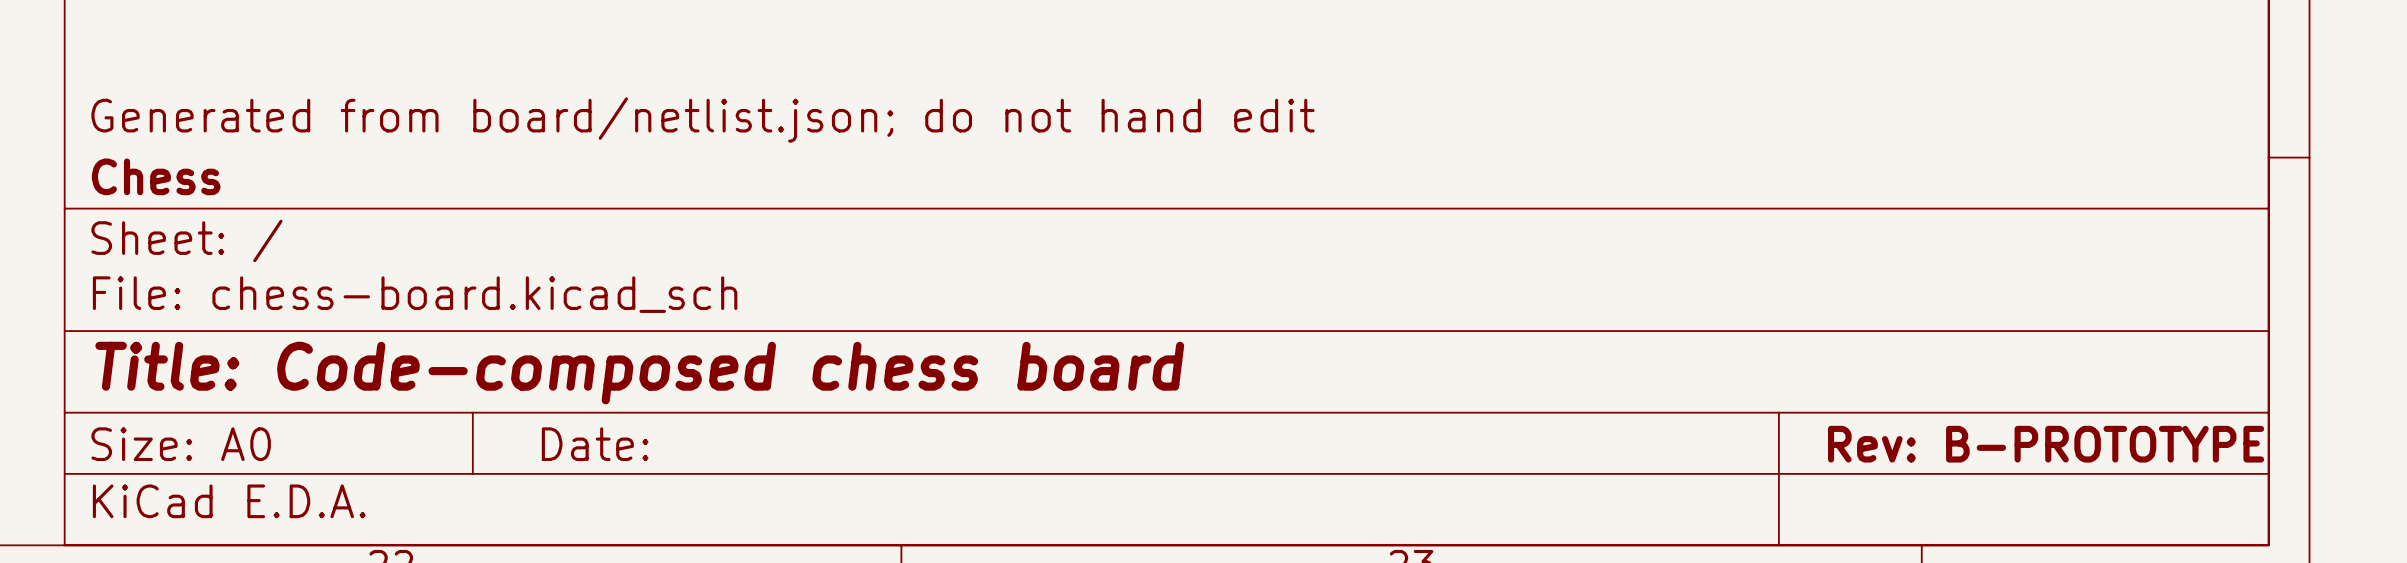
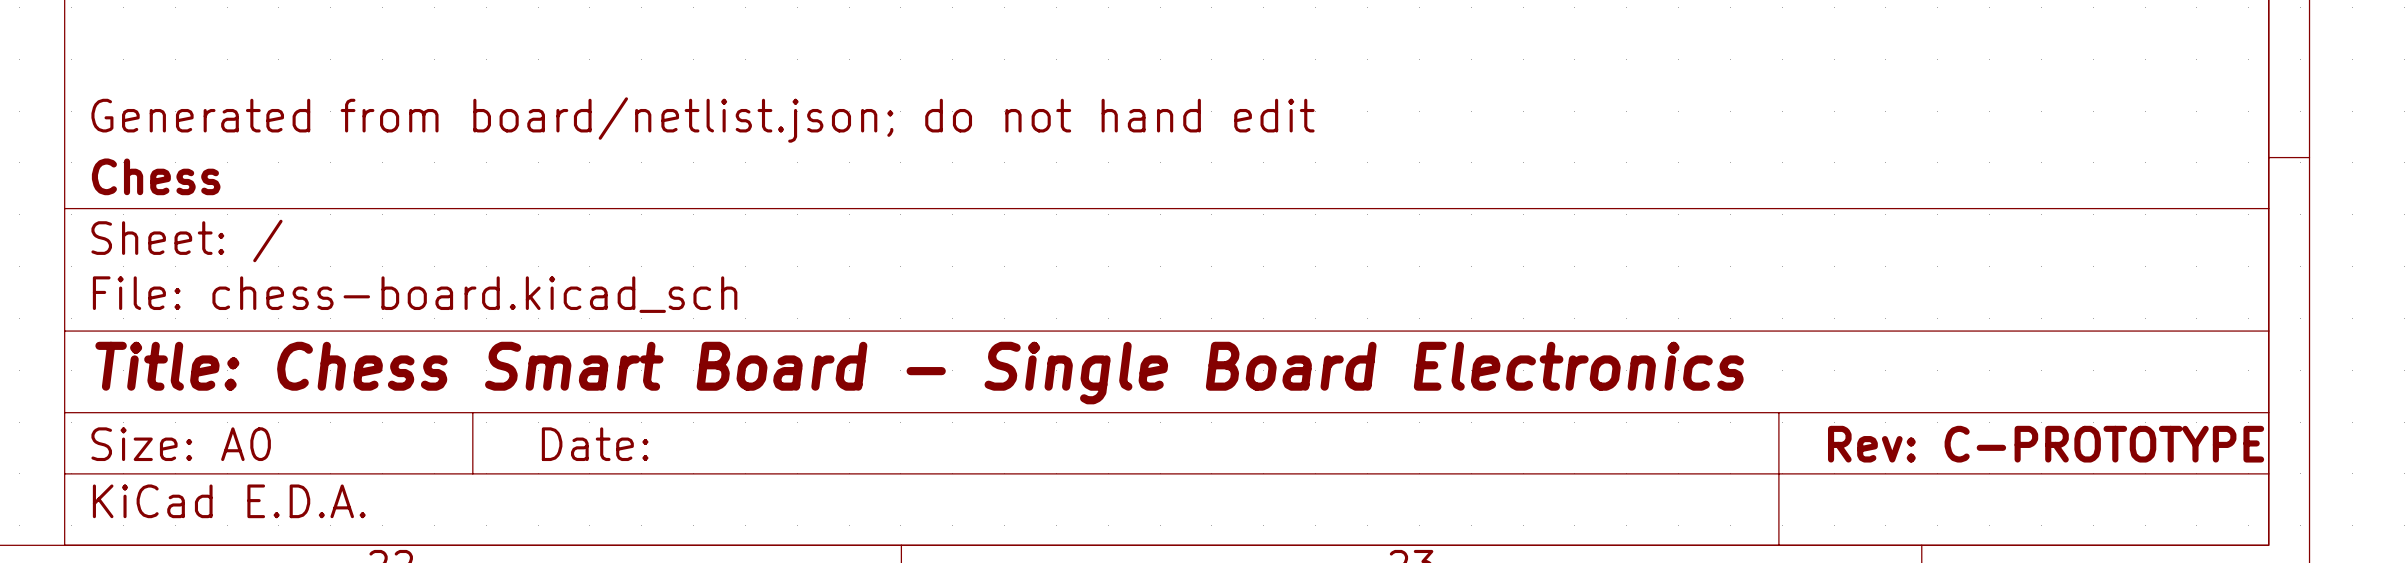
title block: Title: Code-composed chess board (639, 373) -> Title: Chess Smart Board - Single Board Electronics (919, 373)
title block: Rev: B-PROTOTYPE (2046, 444) -> Rev: C-PROTOTYPE (2046, 444)

